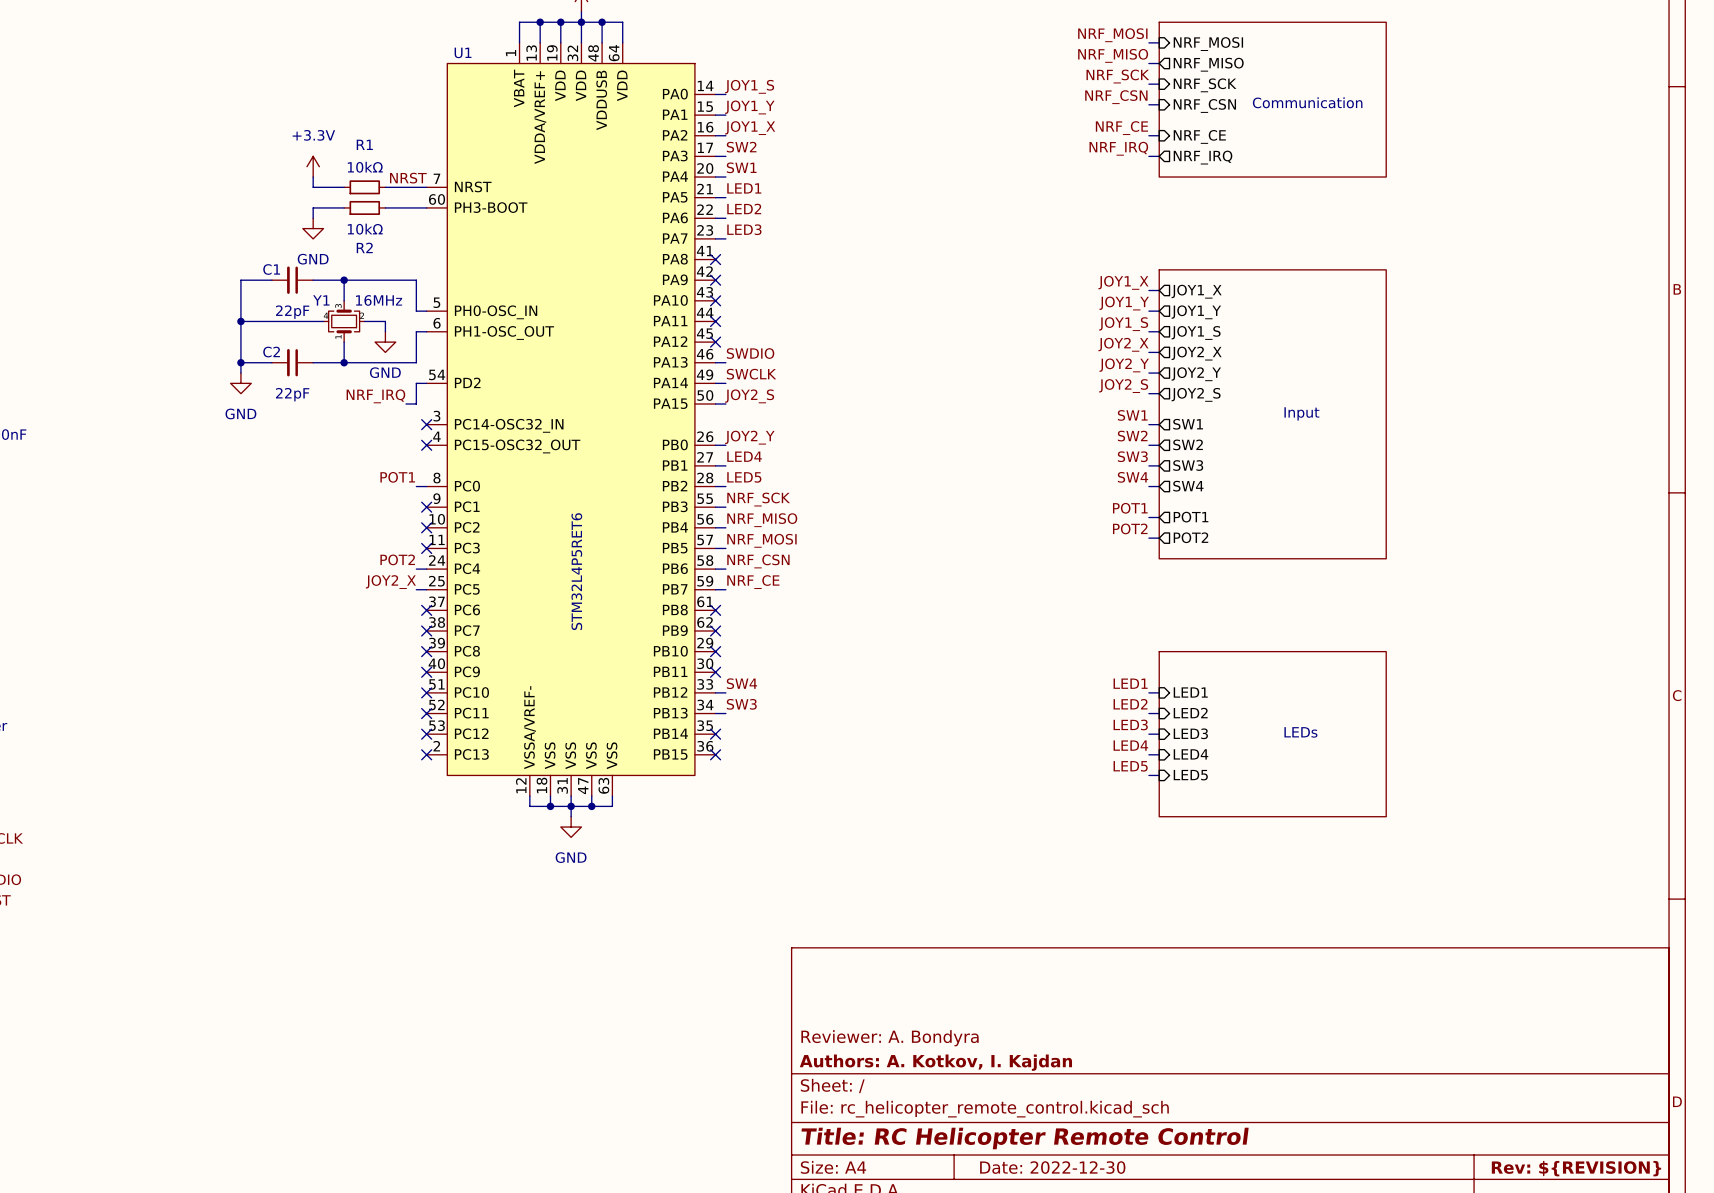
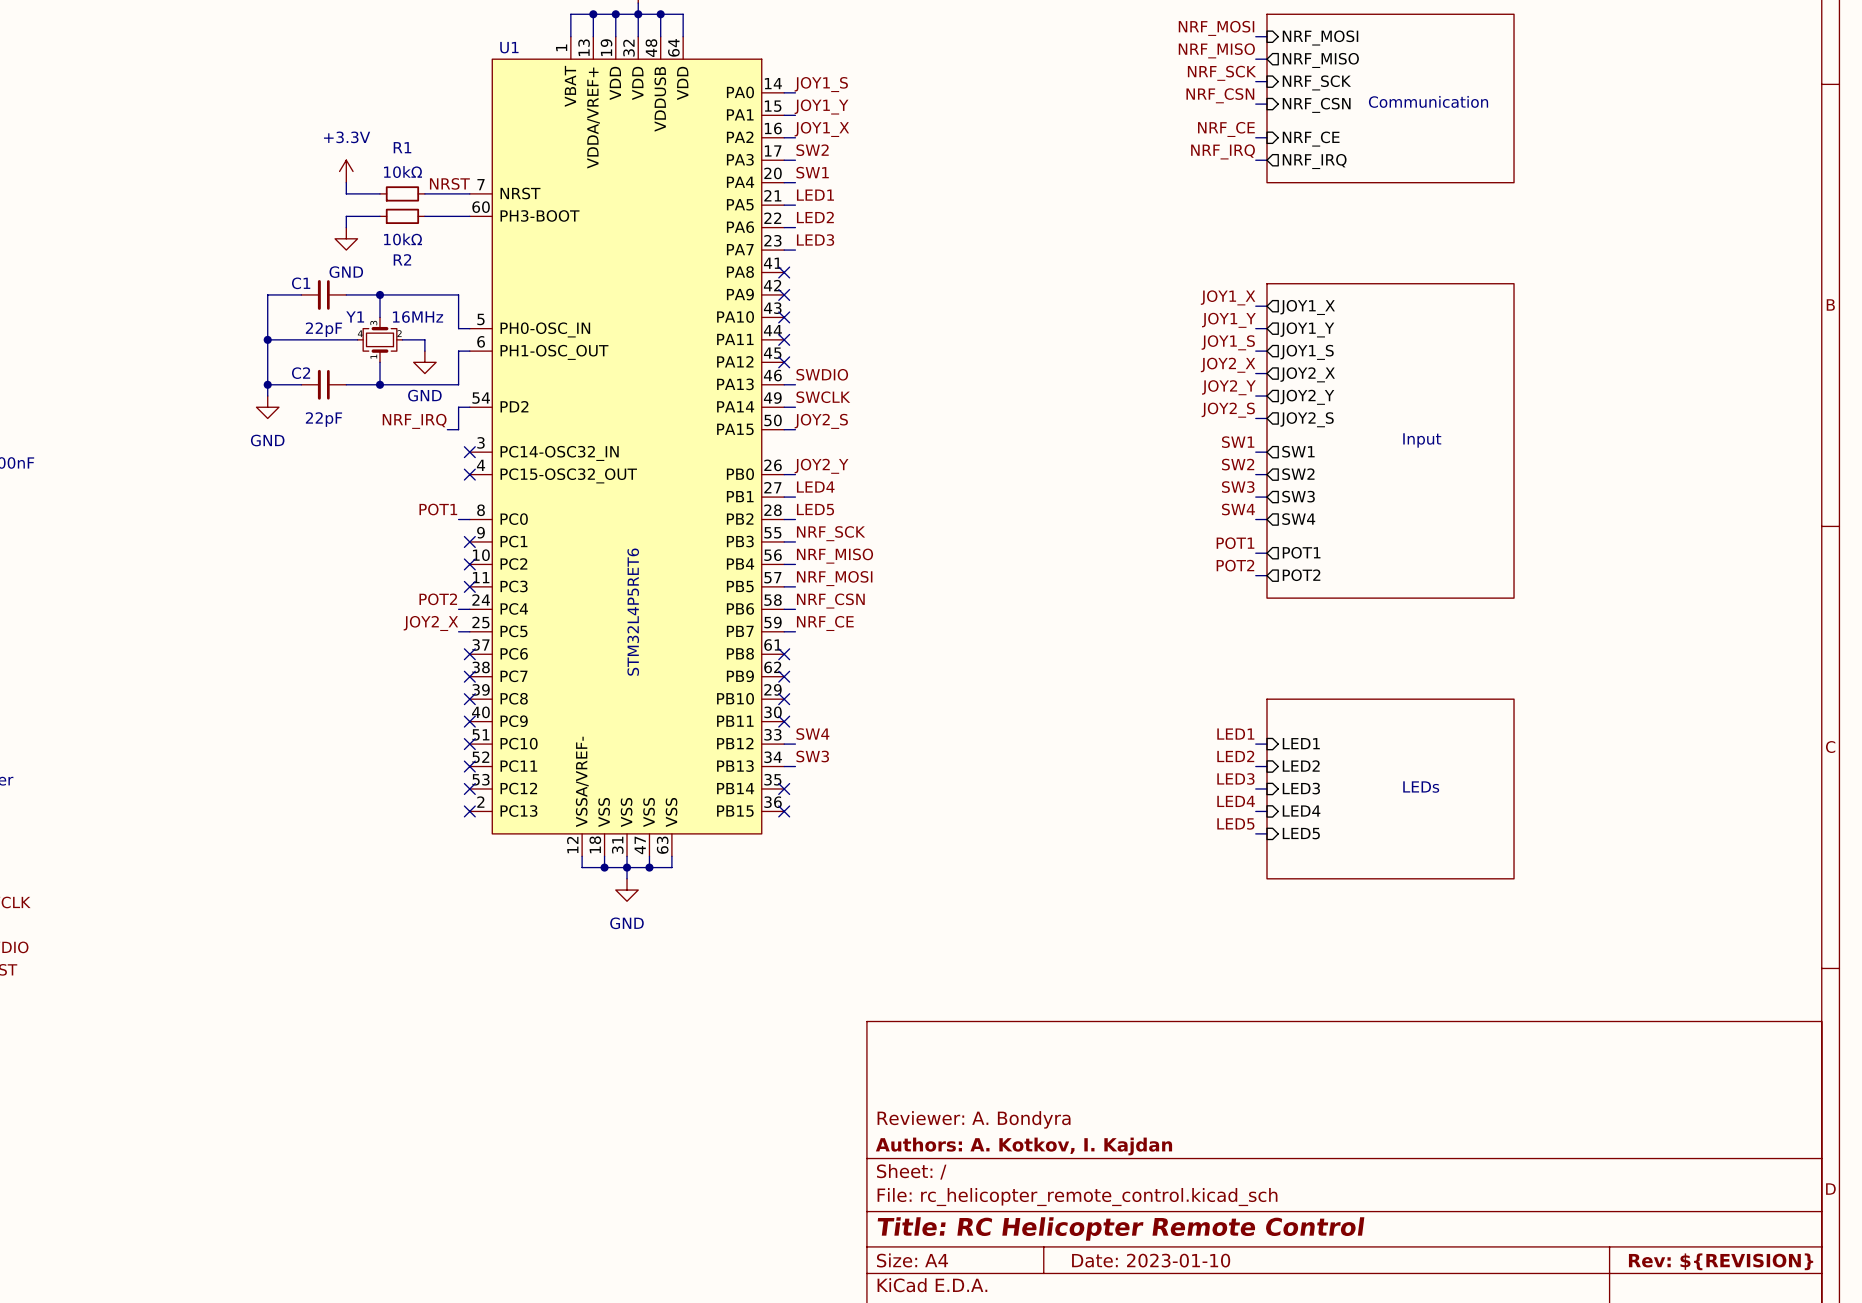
title block: Date: 2022-12-30 (1052, 1167) -> Date: 2023-01-10 (1151, 1260)

